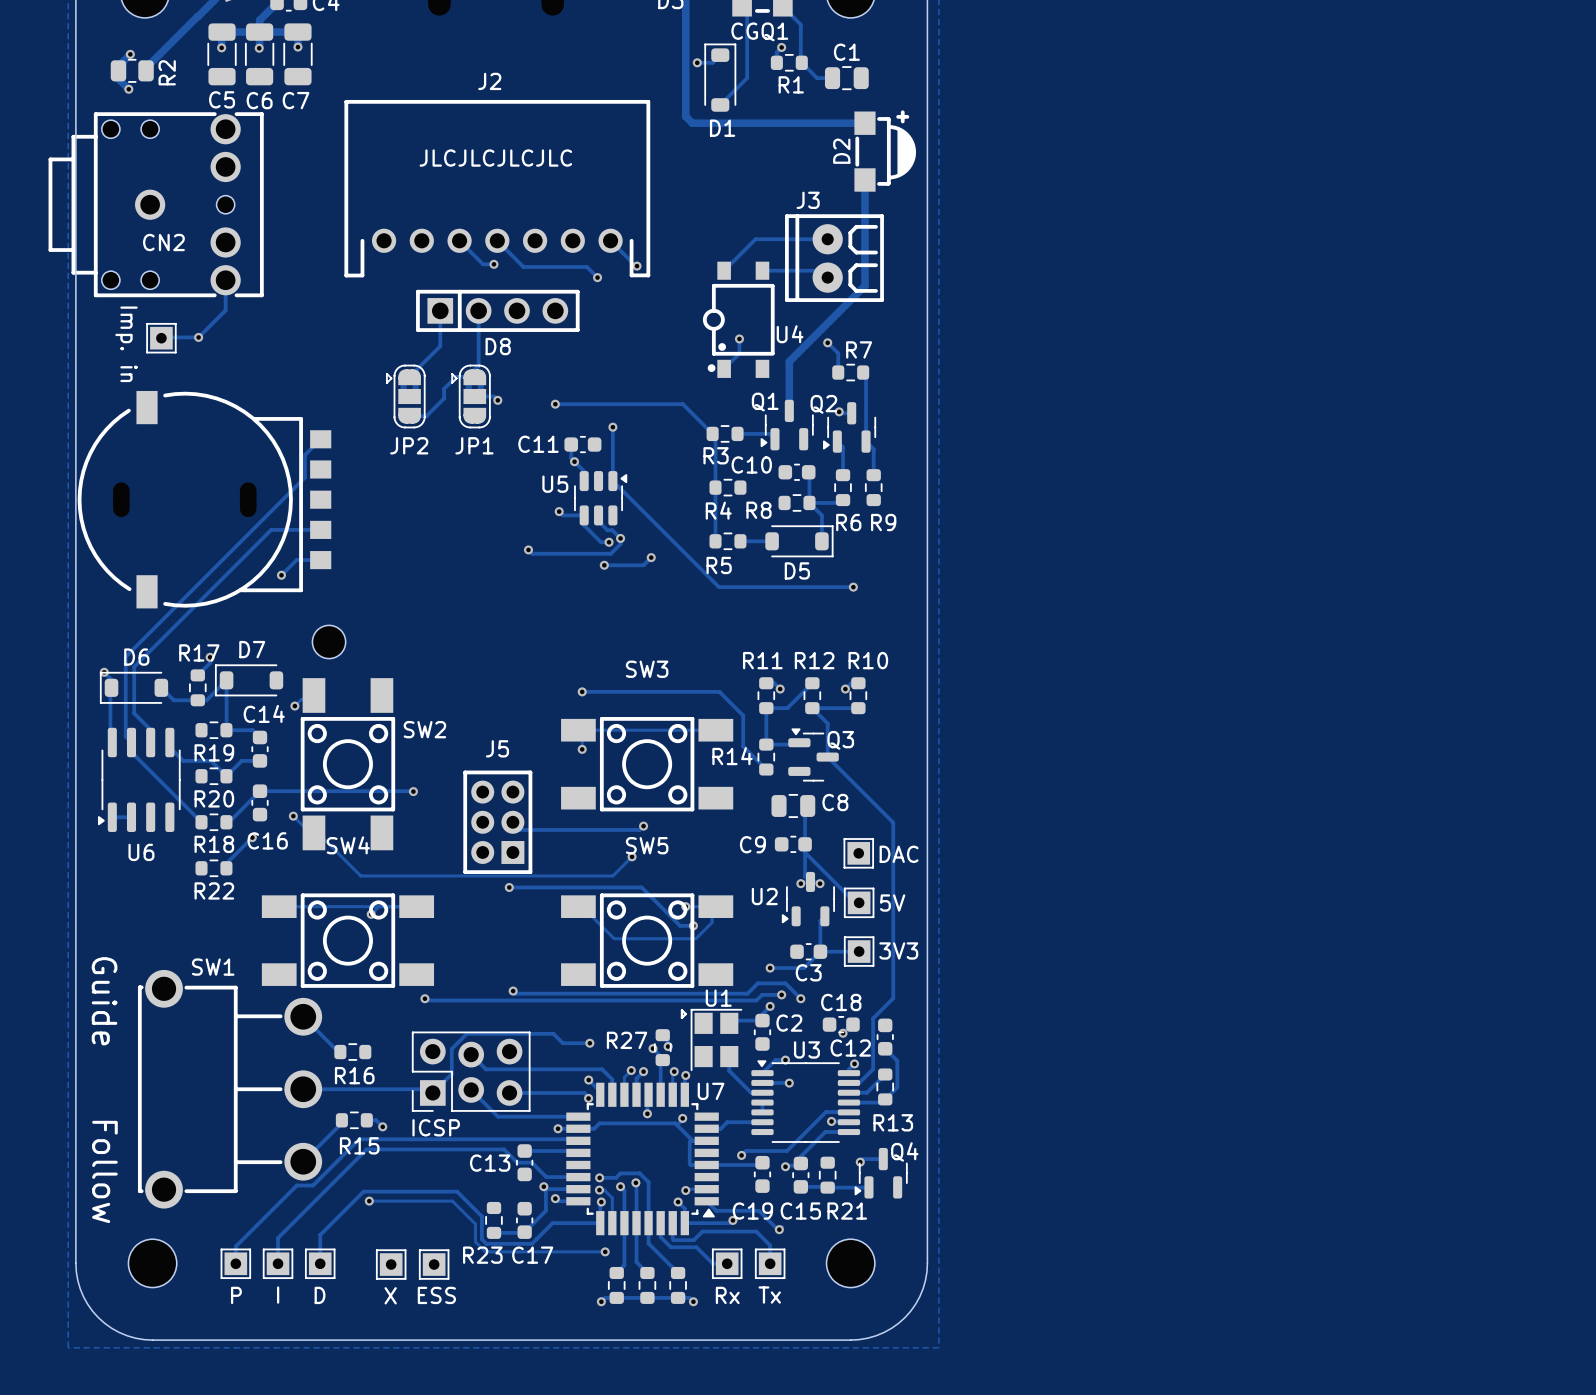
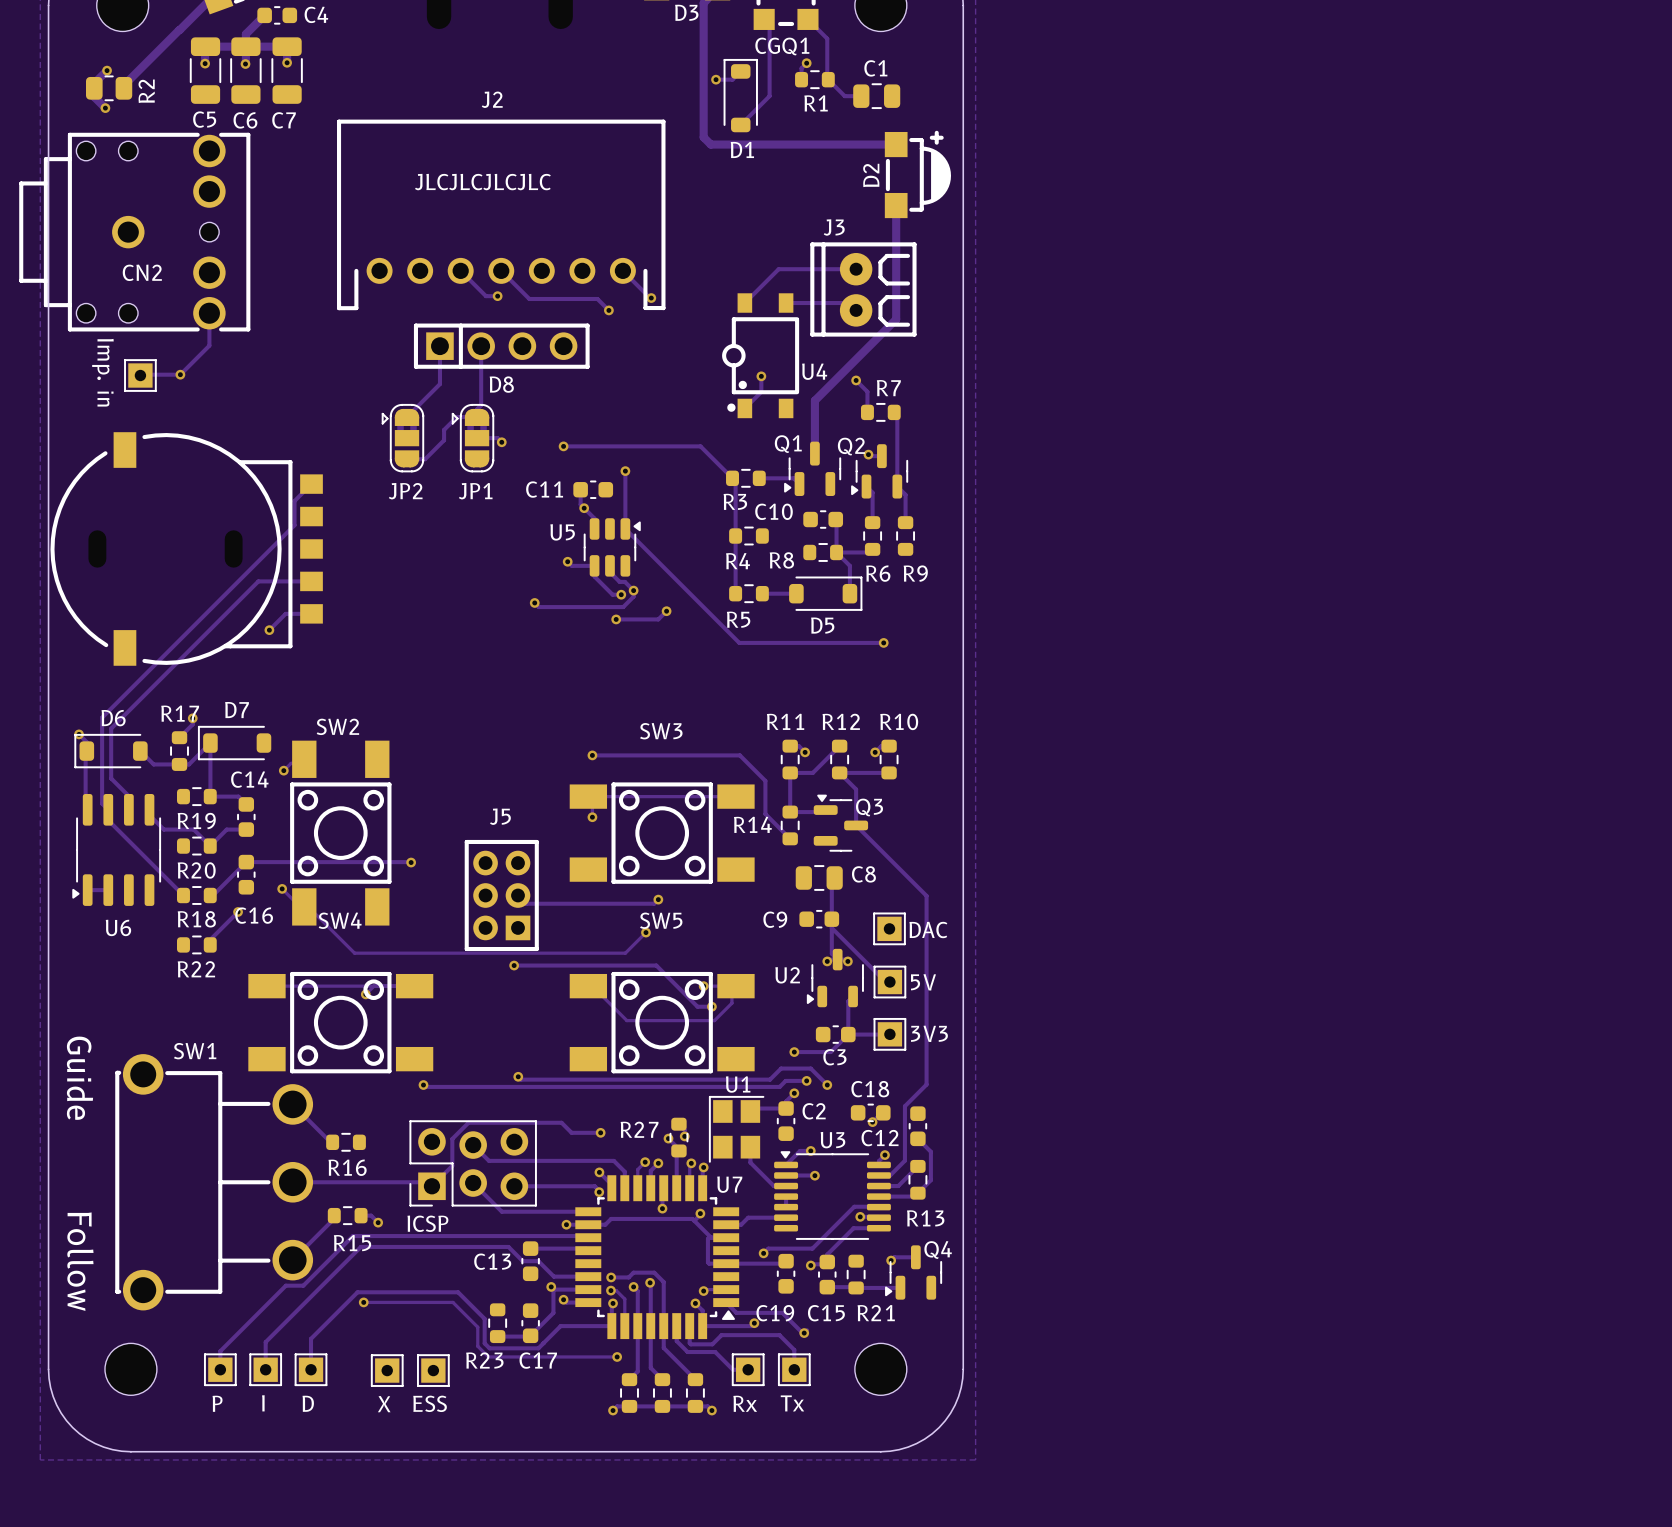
part: (329, 642) -> none
SW2 name position: SW2 (424, 729) -> SW2 (337, 726)
line: (681, 1010) (681, 1017) (685, 1014) (681, 1010) -> none

